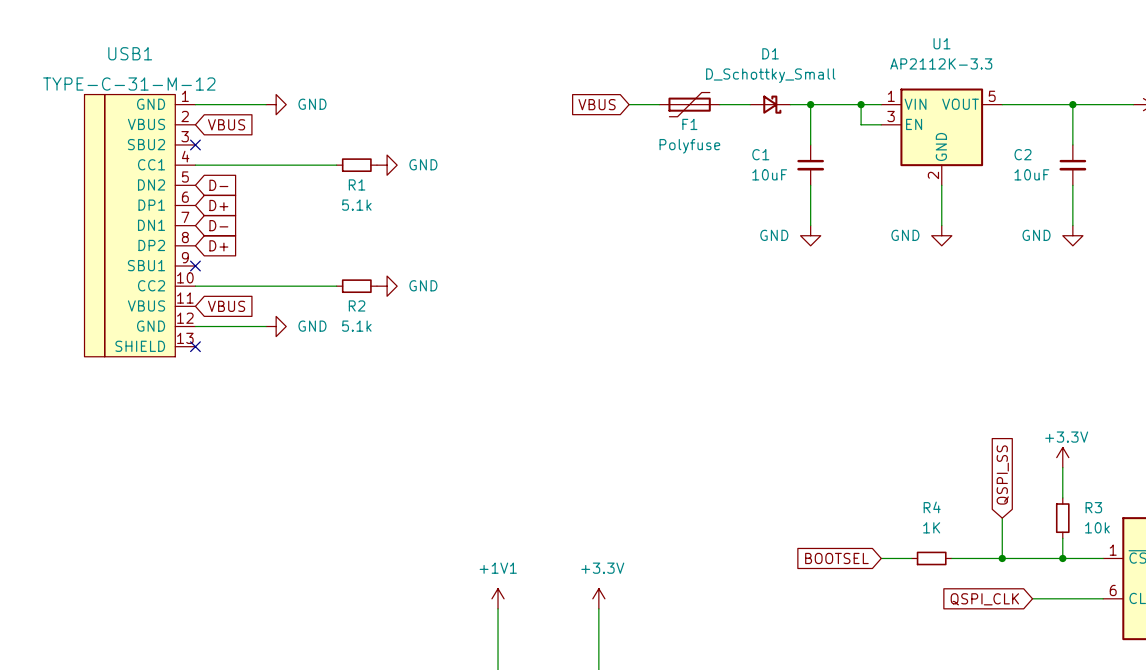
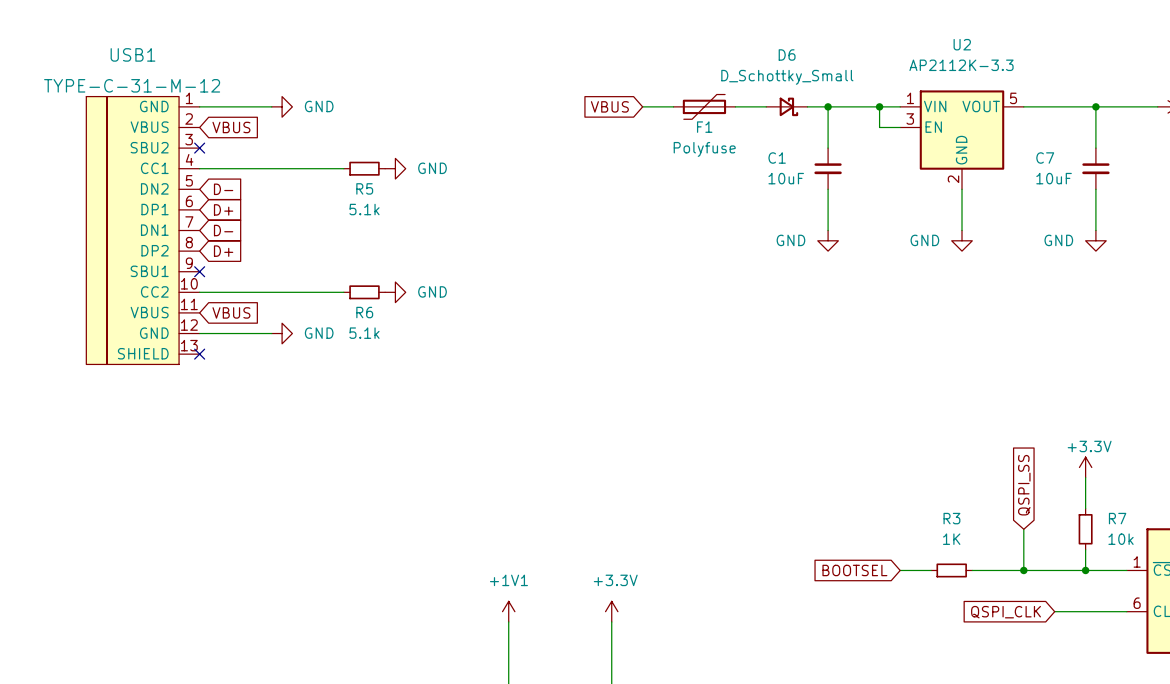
U1 name: U1 (942, 43) -> U2 (962, 44)
D1 name: D1 (770, 53) -> D6 (787, 54)
C2 name: C2 (1023, 154) -> C7 (1045, 158)
R1 name: R1 (357, 184) -> R5 (364, 188)
R2 name: R2 (357, 305) -> R6 (364, 312)
R4 name: R4 (932, 507) -> R3 (951, 518)
R3 name: R3 (1093, 507) -> R7 (1117, 518)

